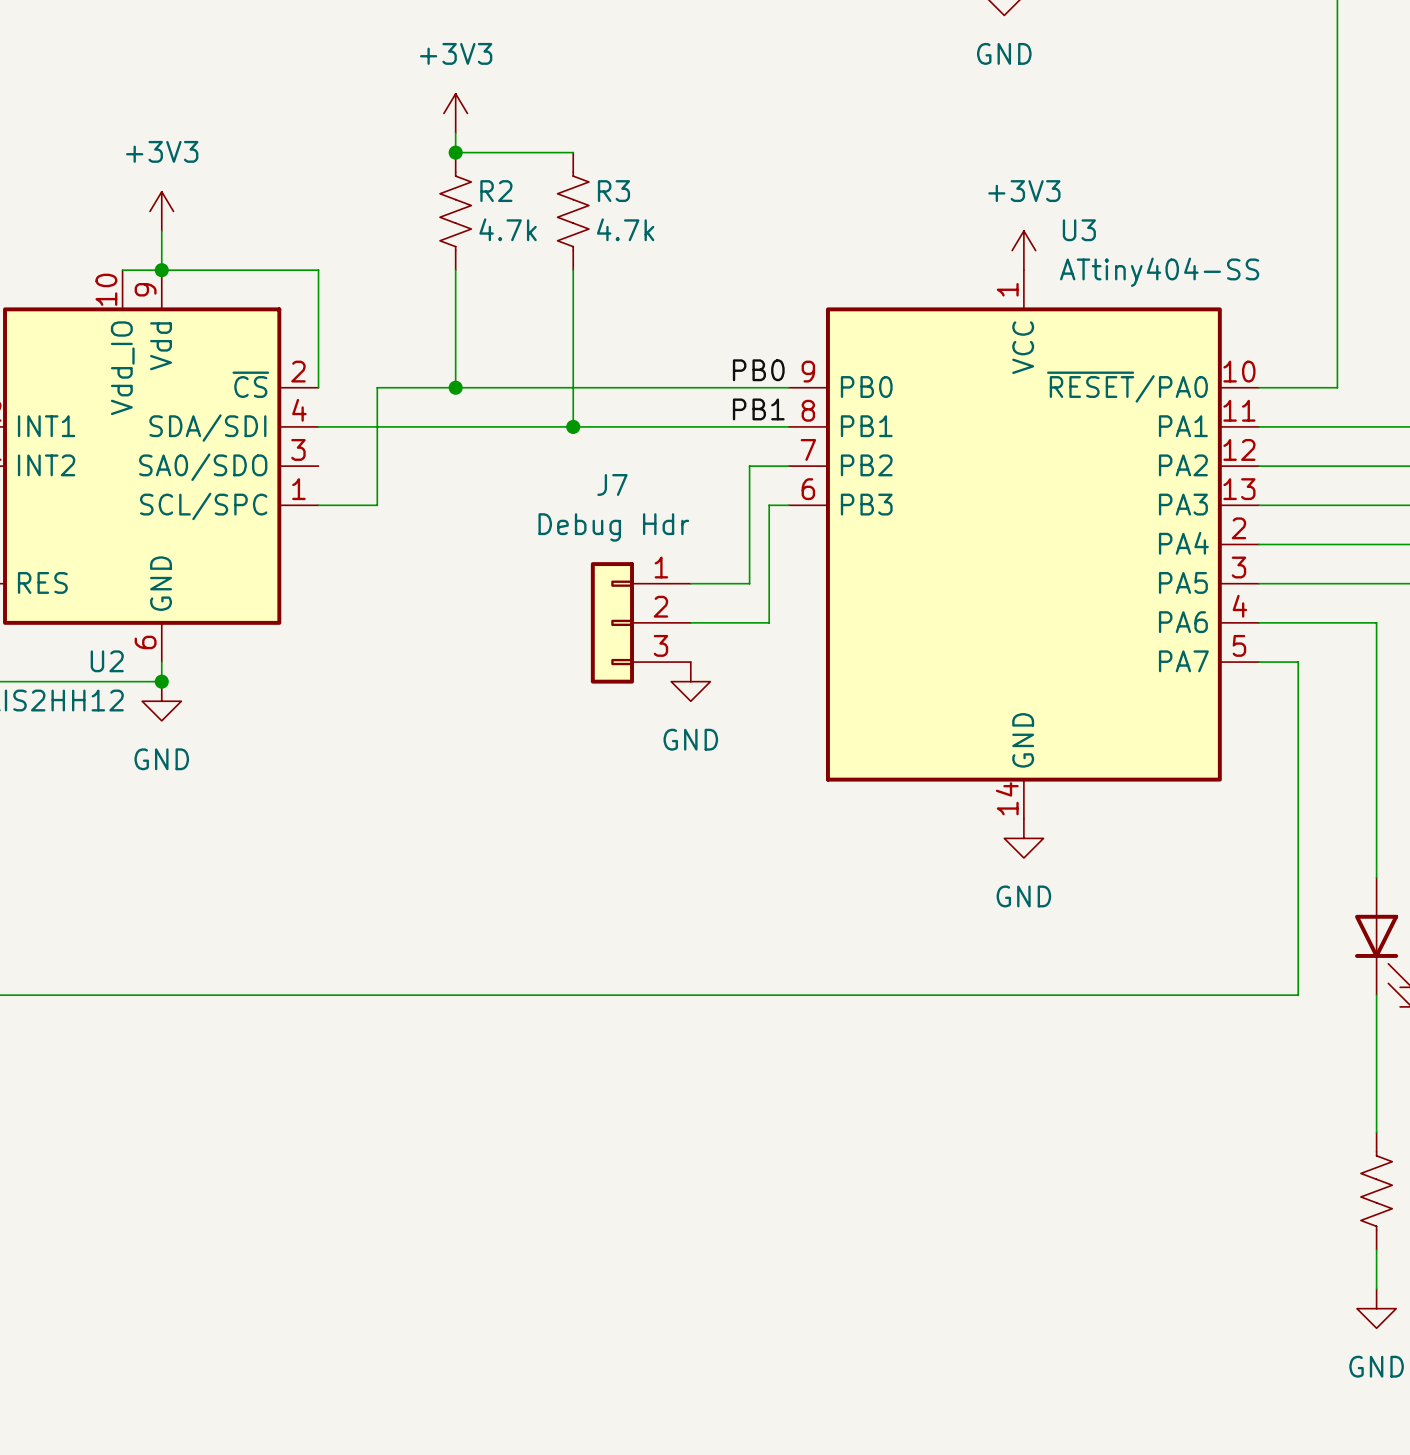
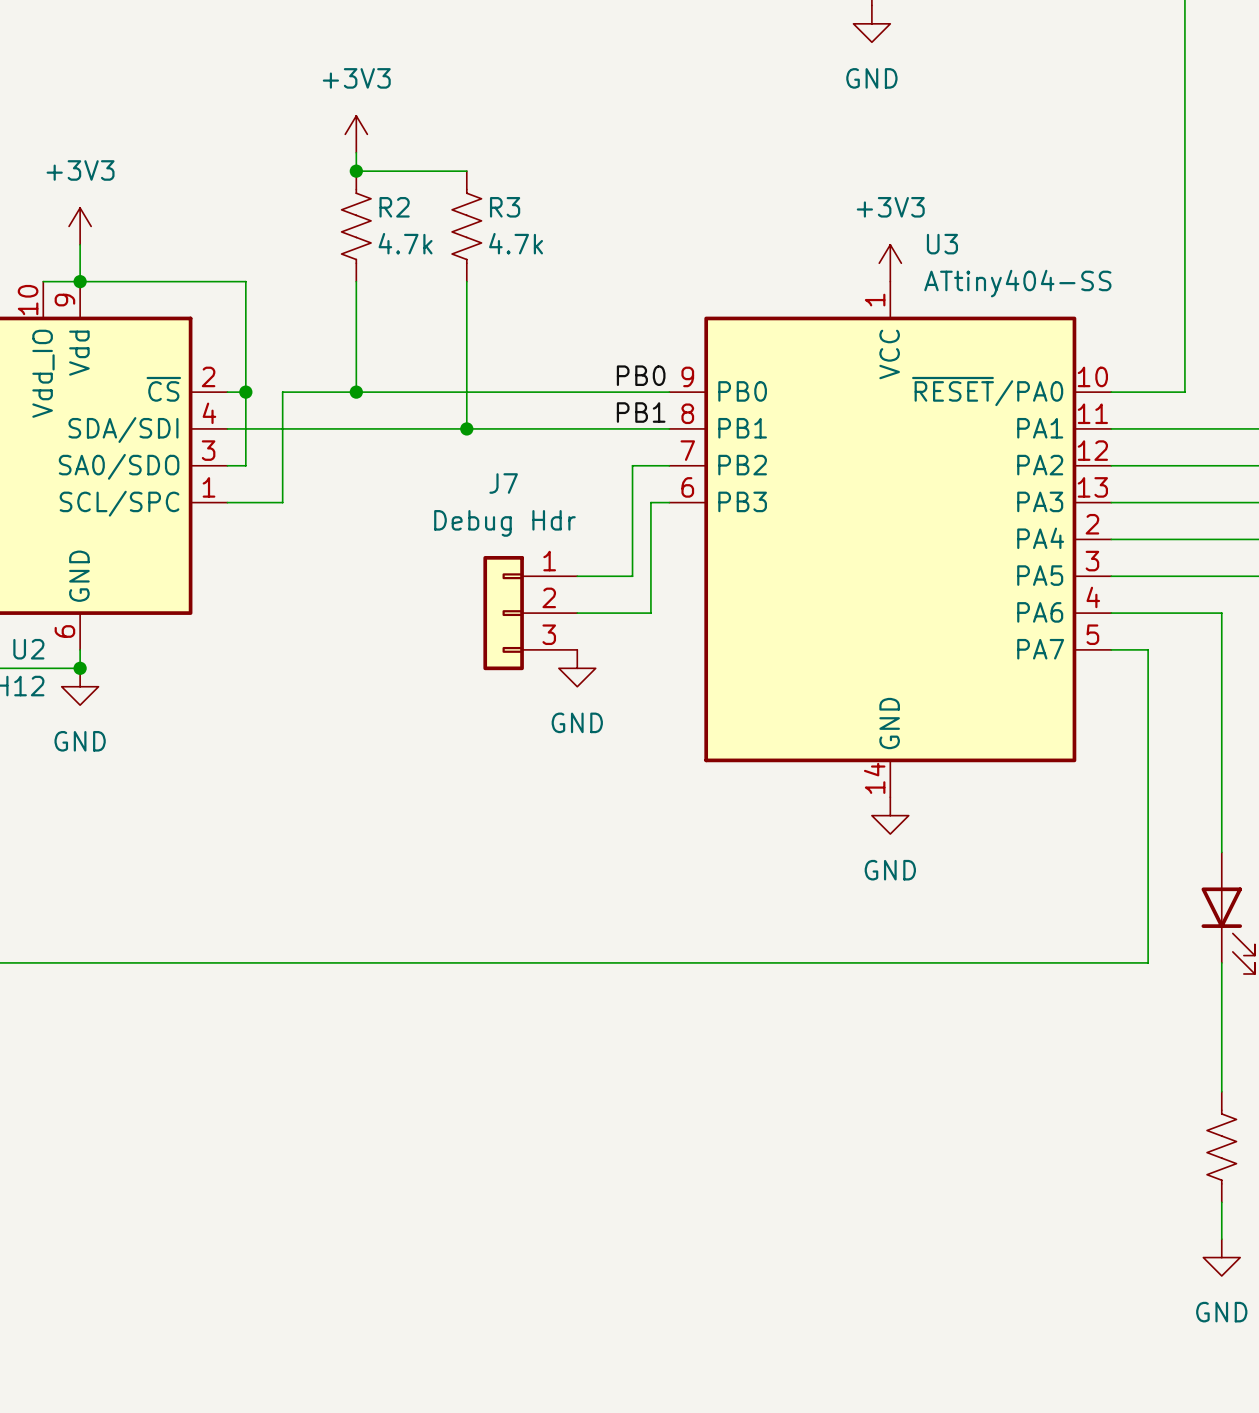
wire: (318, 270) (318, 387) -> (227, 281) (245, 281) (245, 465) (227, 465)
wire: none -> (227, 392) (245, 392)
junction: none -> (245, 392)

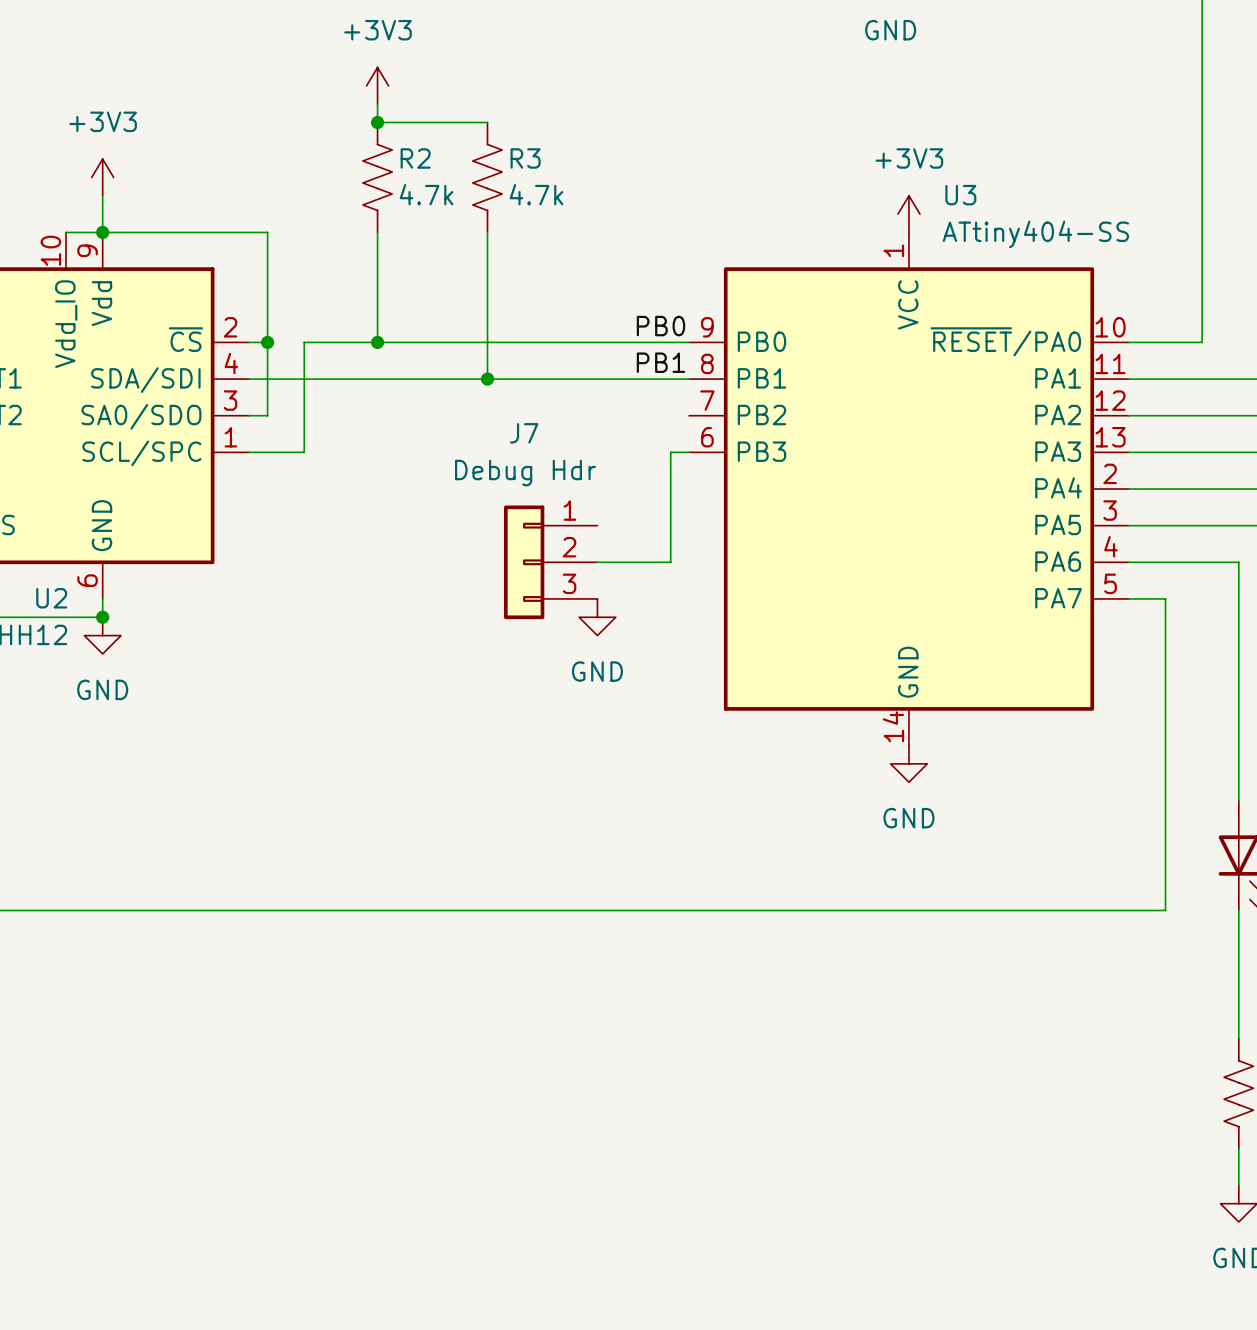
wire: (669, 465) (632, 465) (632, 576) (577, 576) -> none

